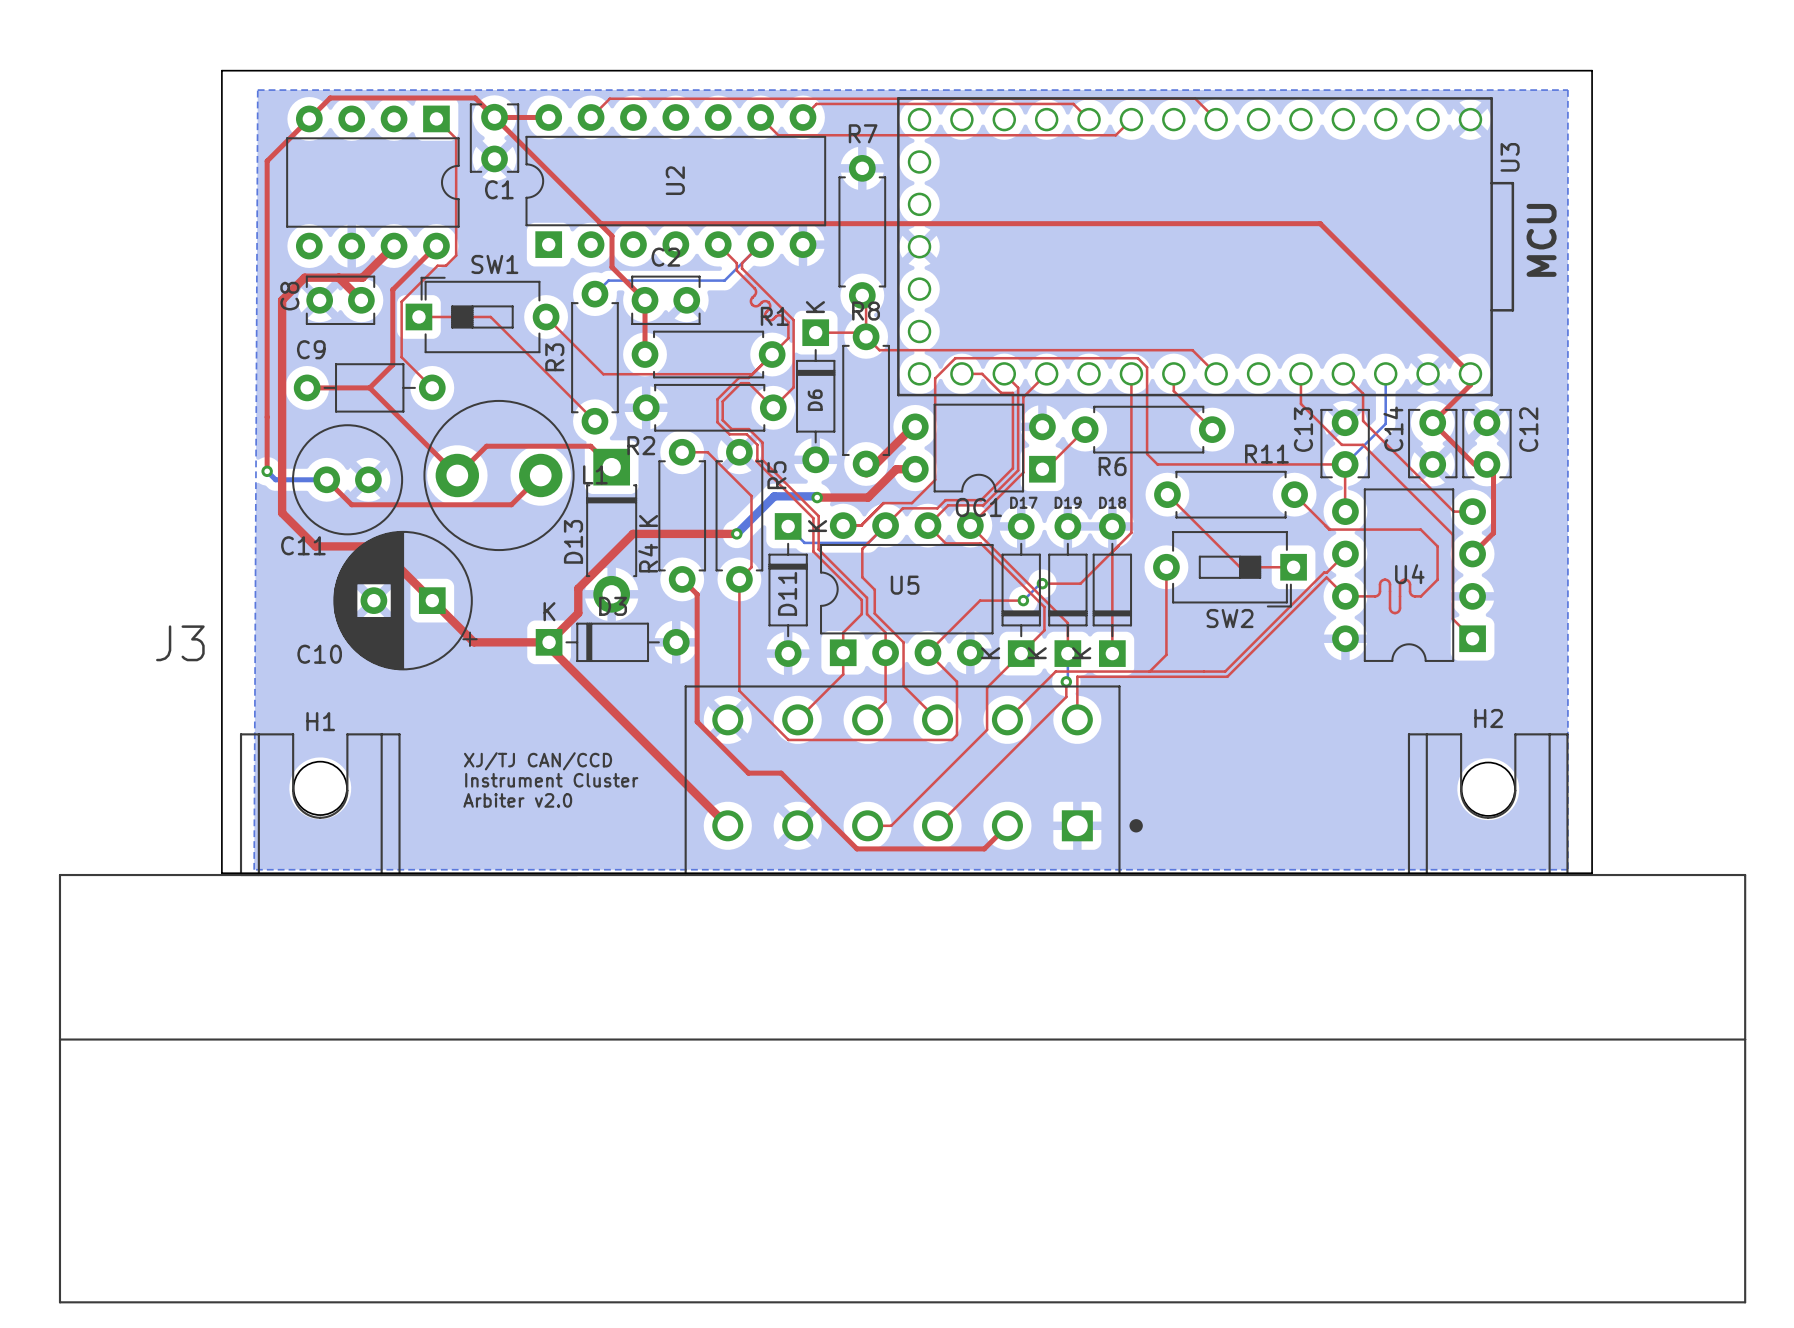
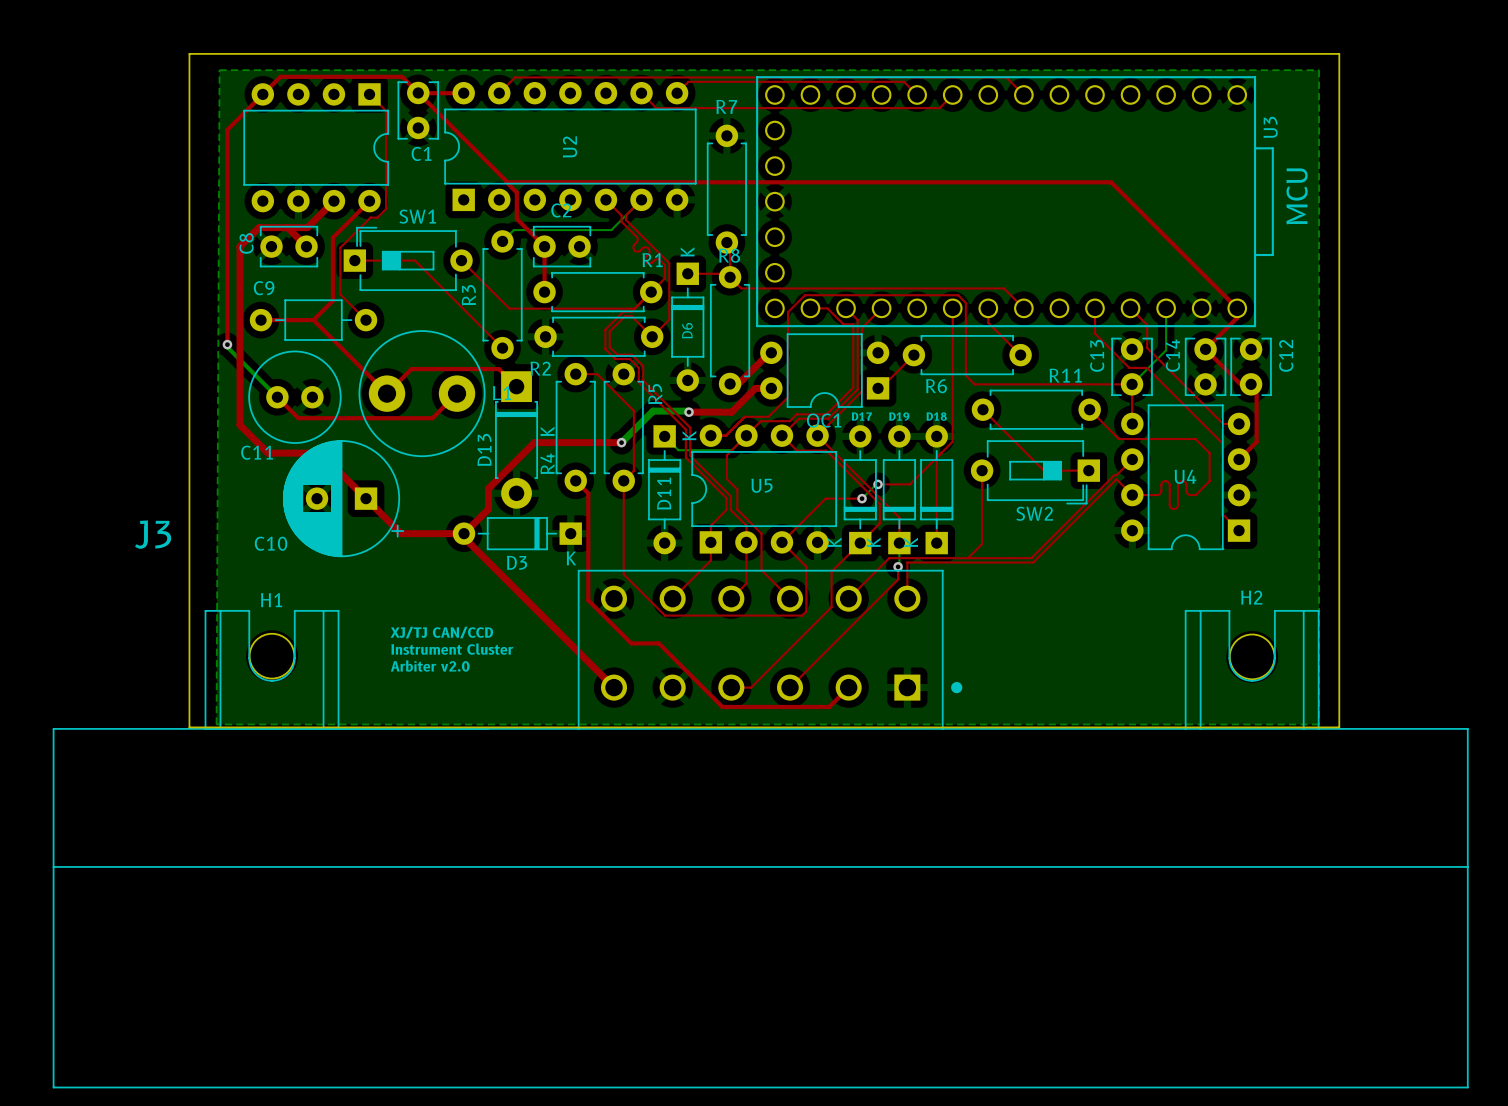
top track: (267, 417) (267, 471) -> none
bottom track: (267, 471) (275, 479) (326, 479) -> (227, 344) (227, 347) (277, 397)
via position: (267, 471) -> (227, 344)
D3 rotation: 0° (612, 642) -> 180° (517, 533)

